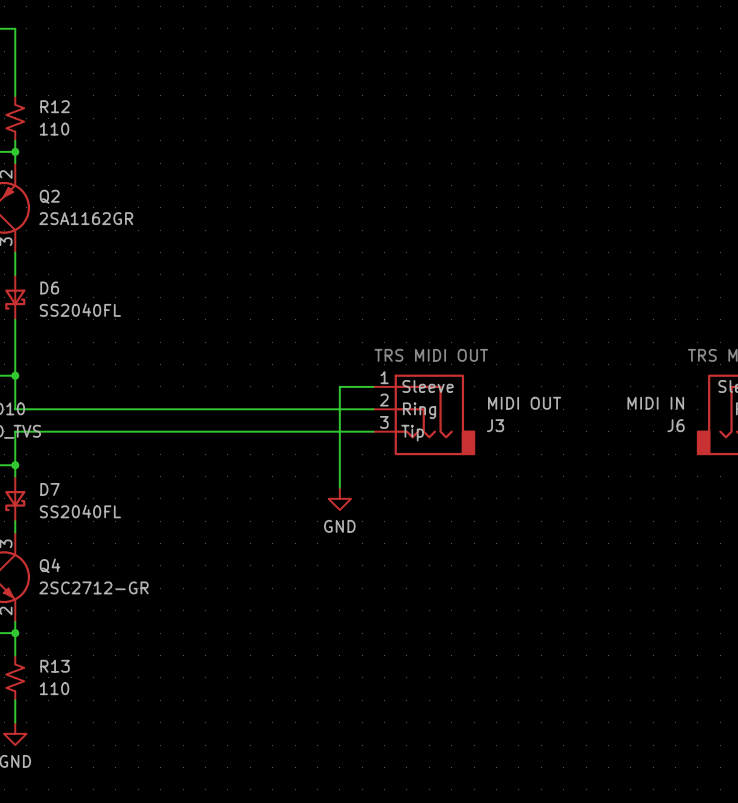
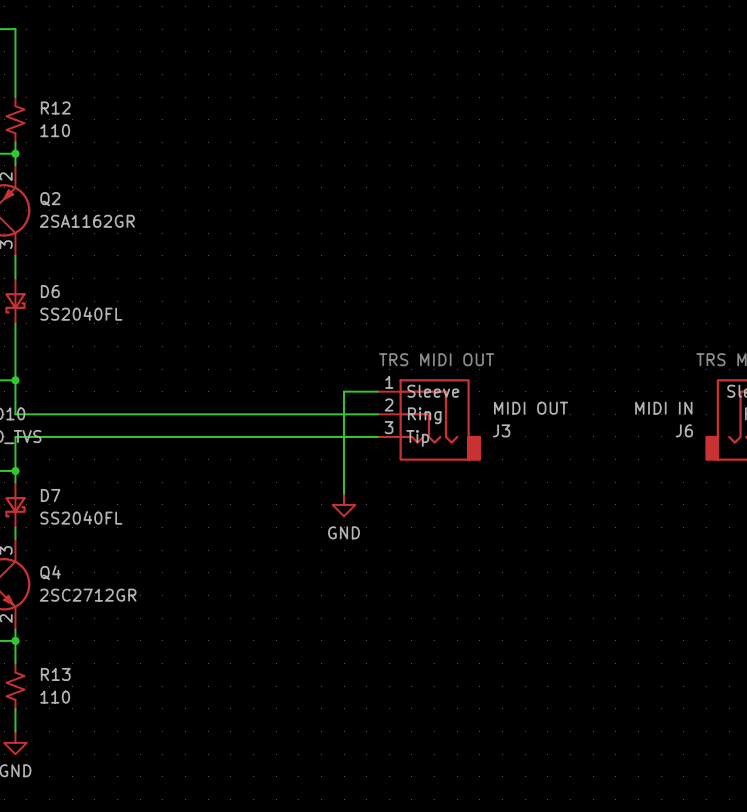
Q4 value: 2SC2712-GR (93, 587) -> 2SC2712GR (88, 595)

